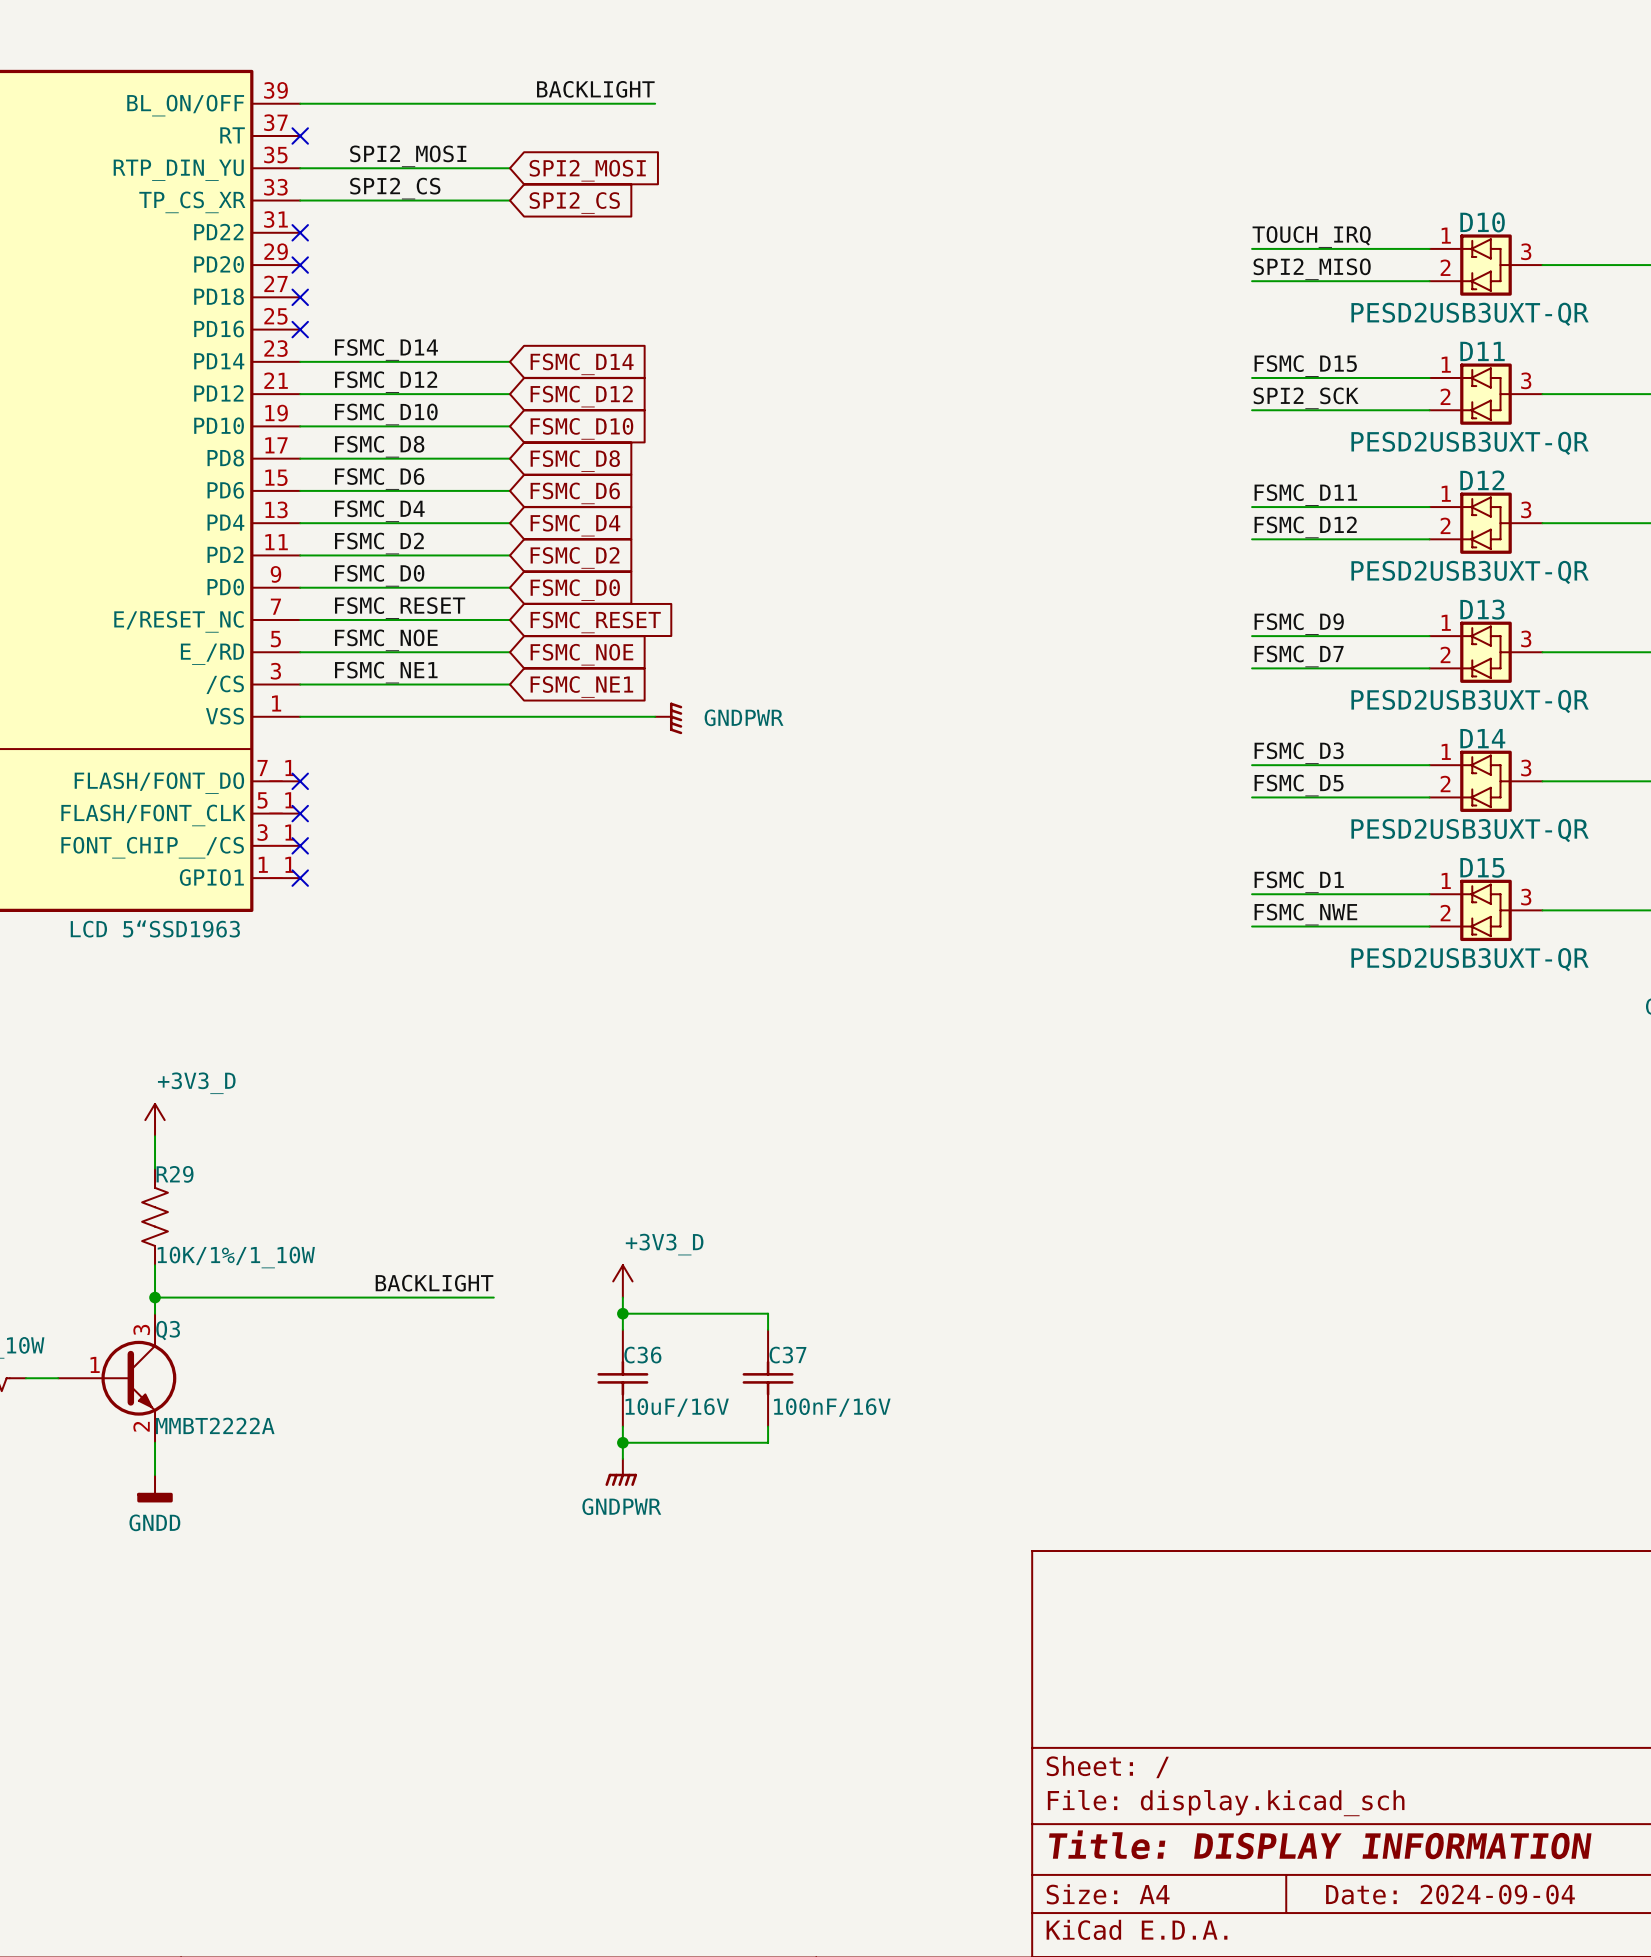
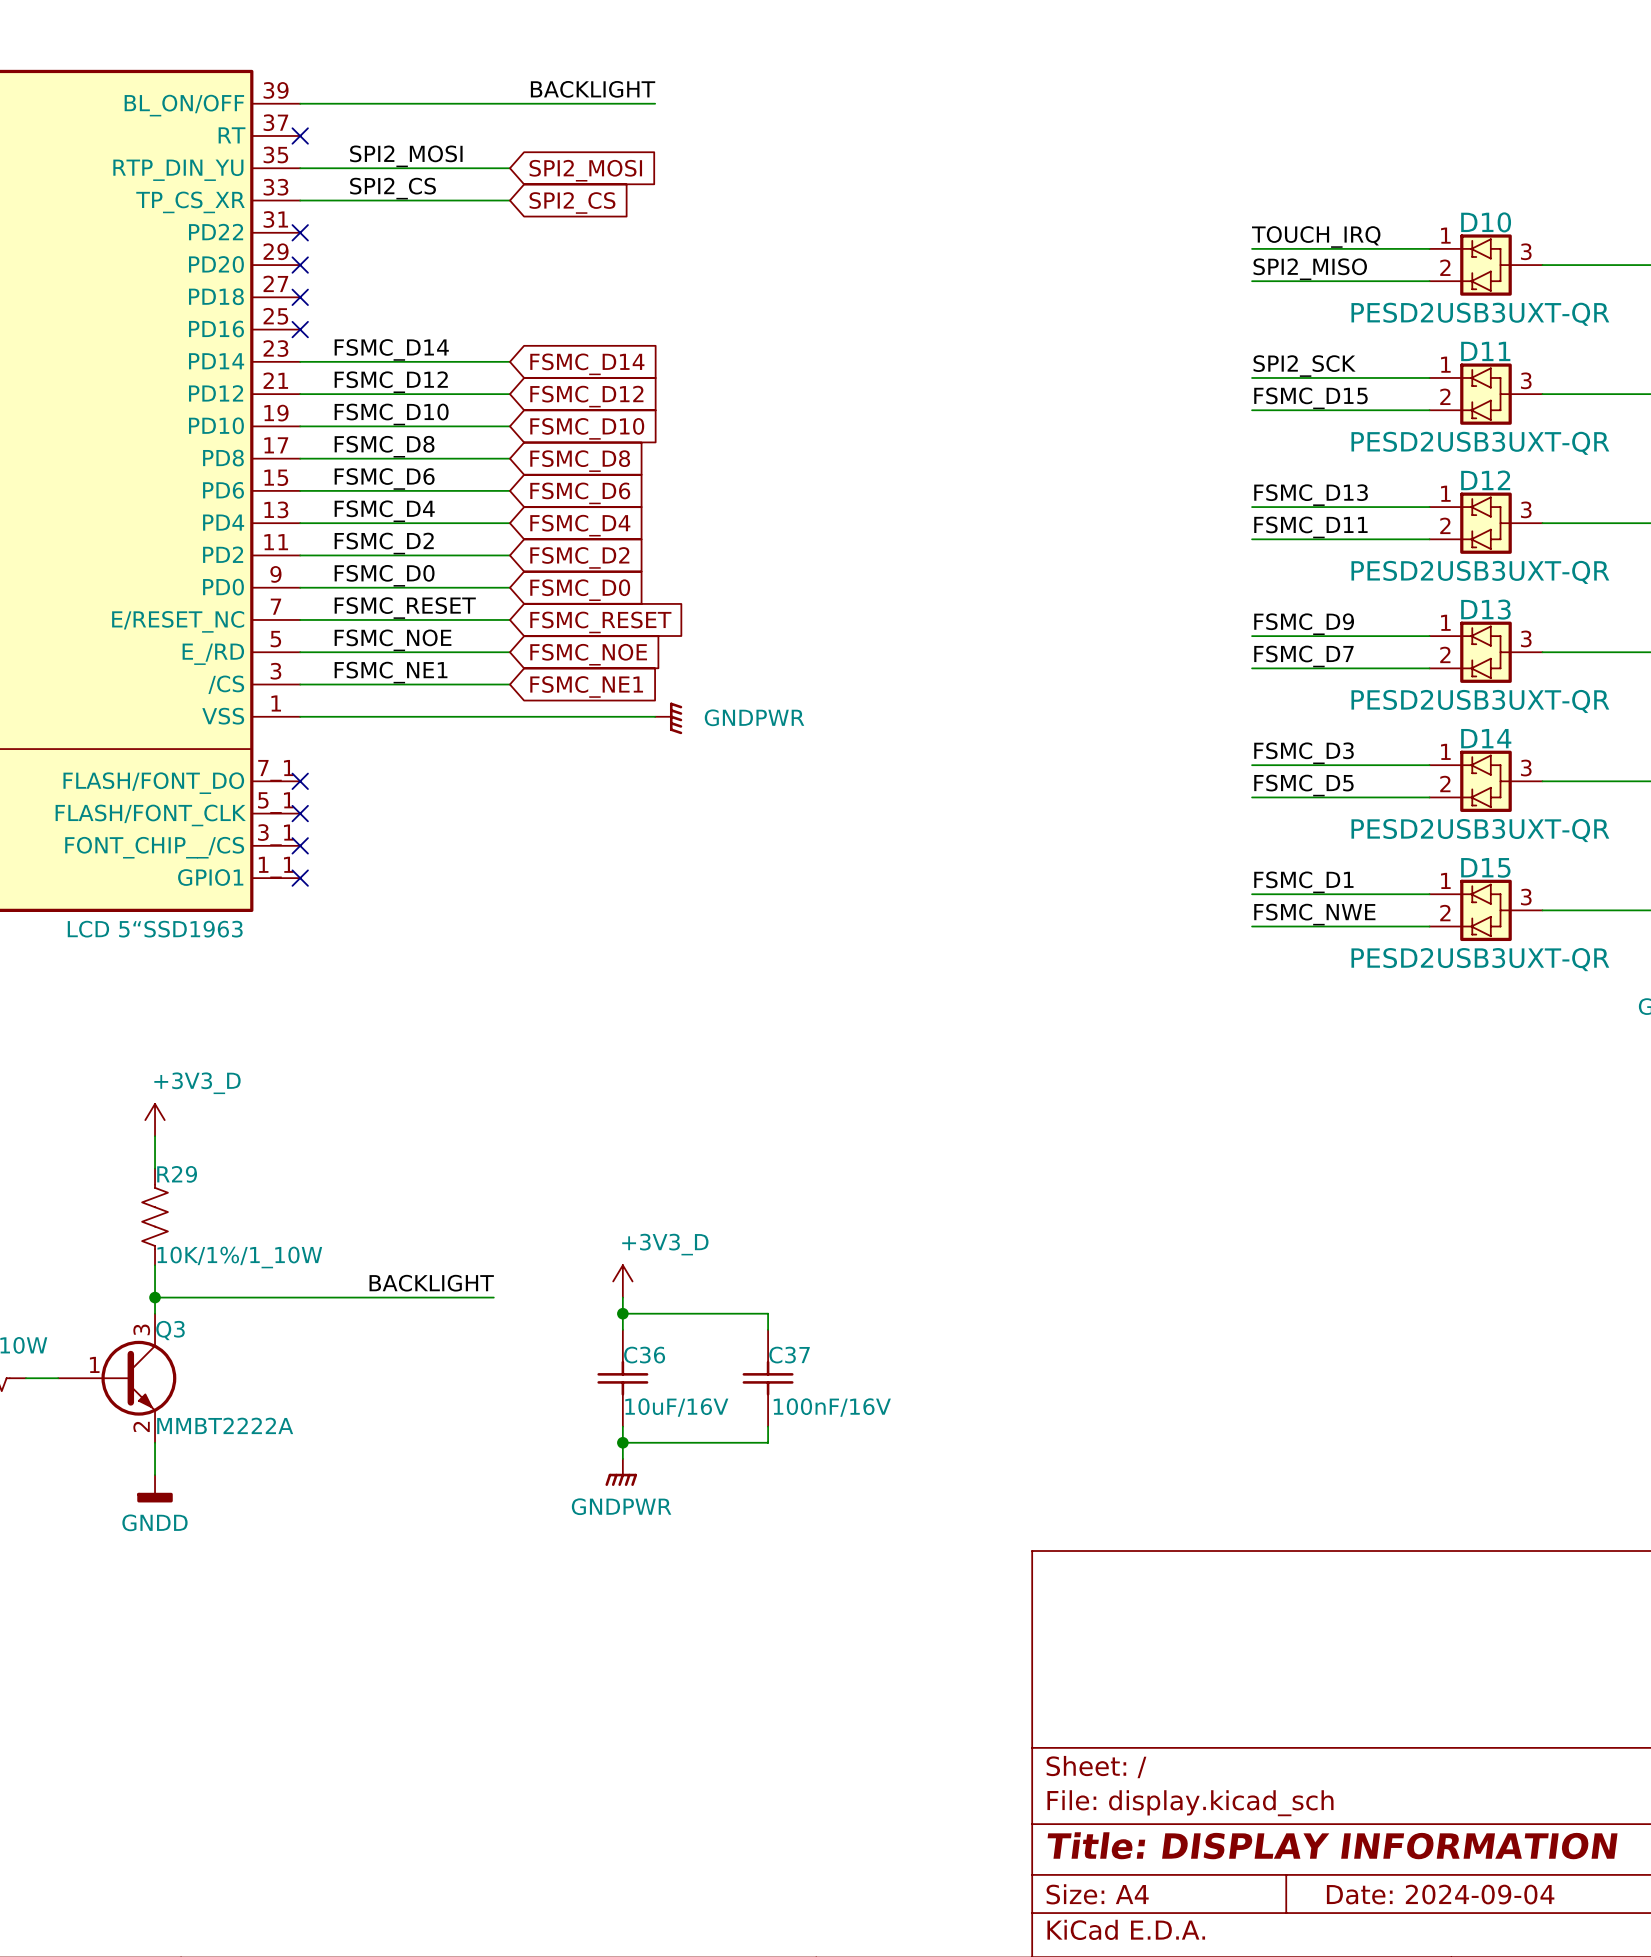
label: FSMC_D15 (1305, 366) -> SPI2_SCK (1304, 366)
label: SPI2_SCK (1306, 398) -> FSMC_D15 (1310, 398)
label: FSMC_D11 (1305, 495) -> FSMC_D13 (1311, 495)
label: FSMC_D12 (1305, 527) -> FSMC_D11 (1310, 527)

